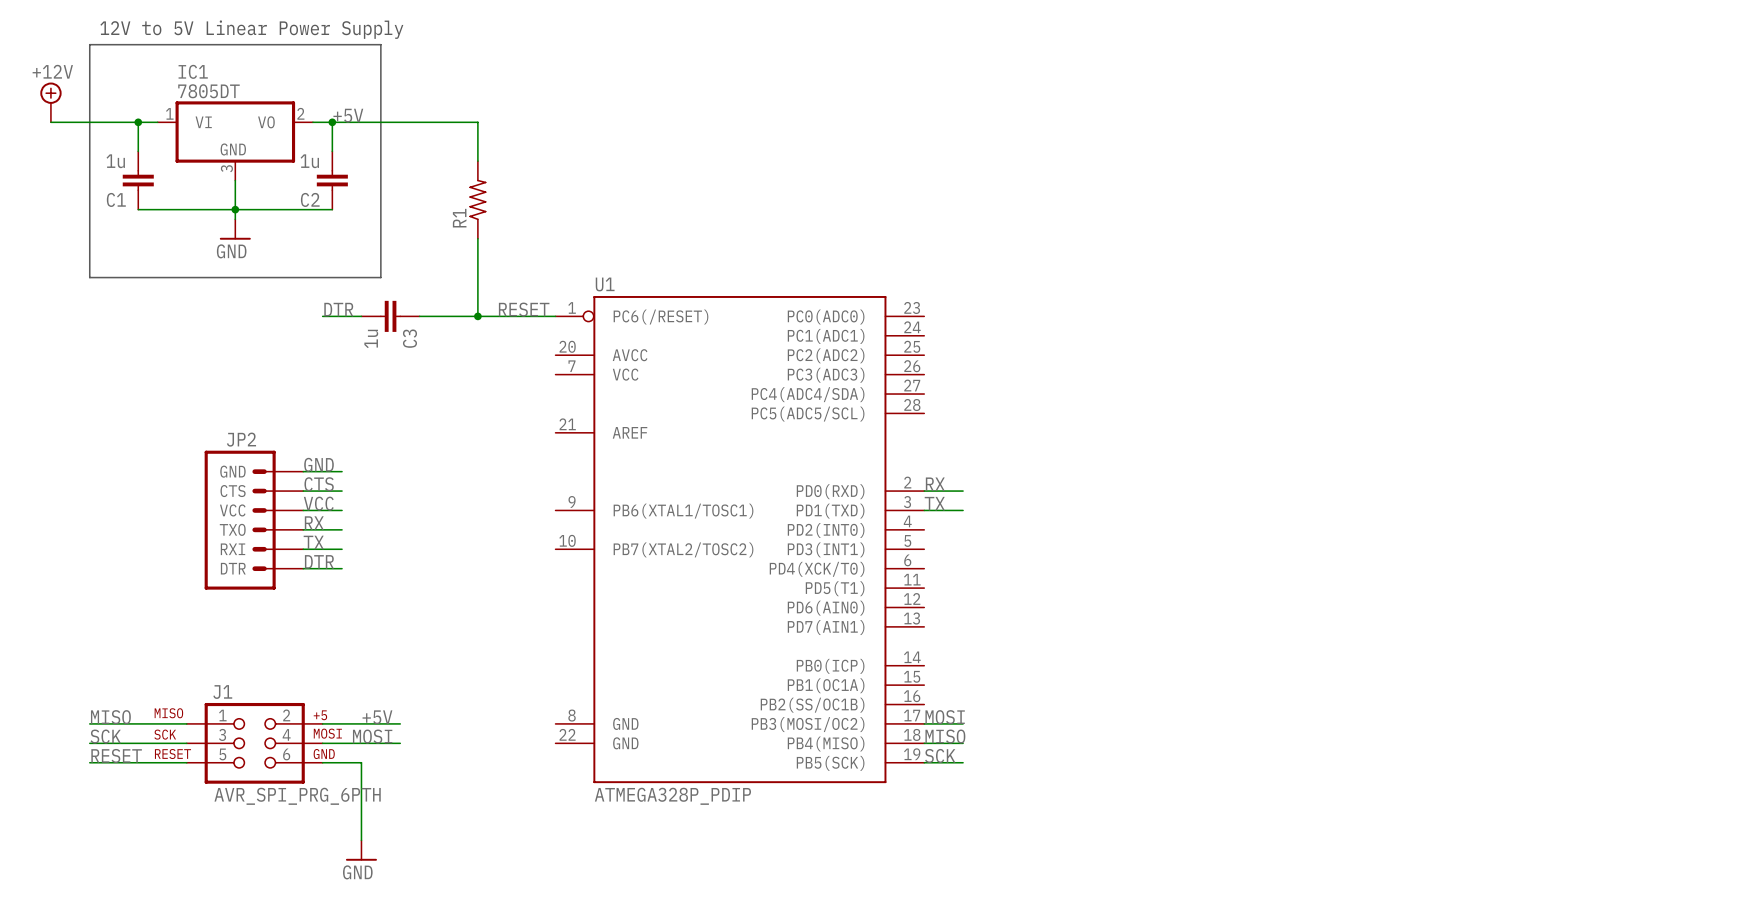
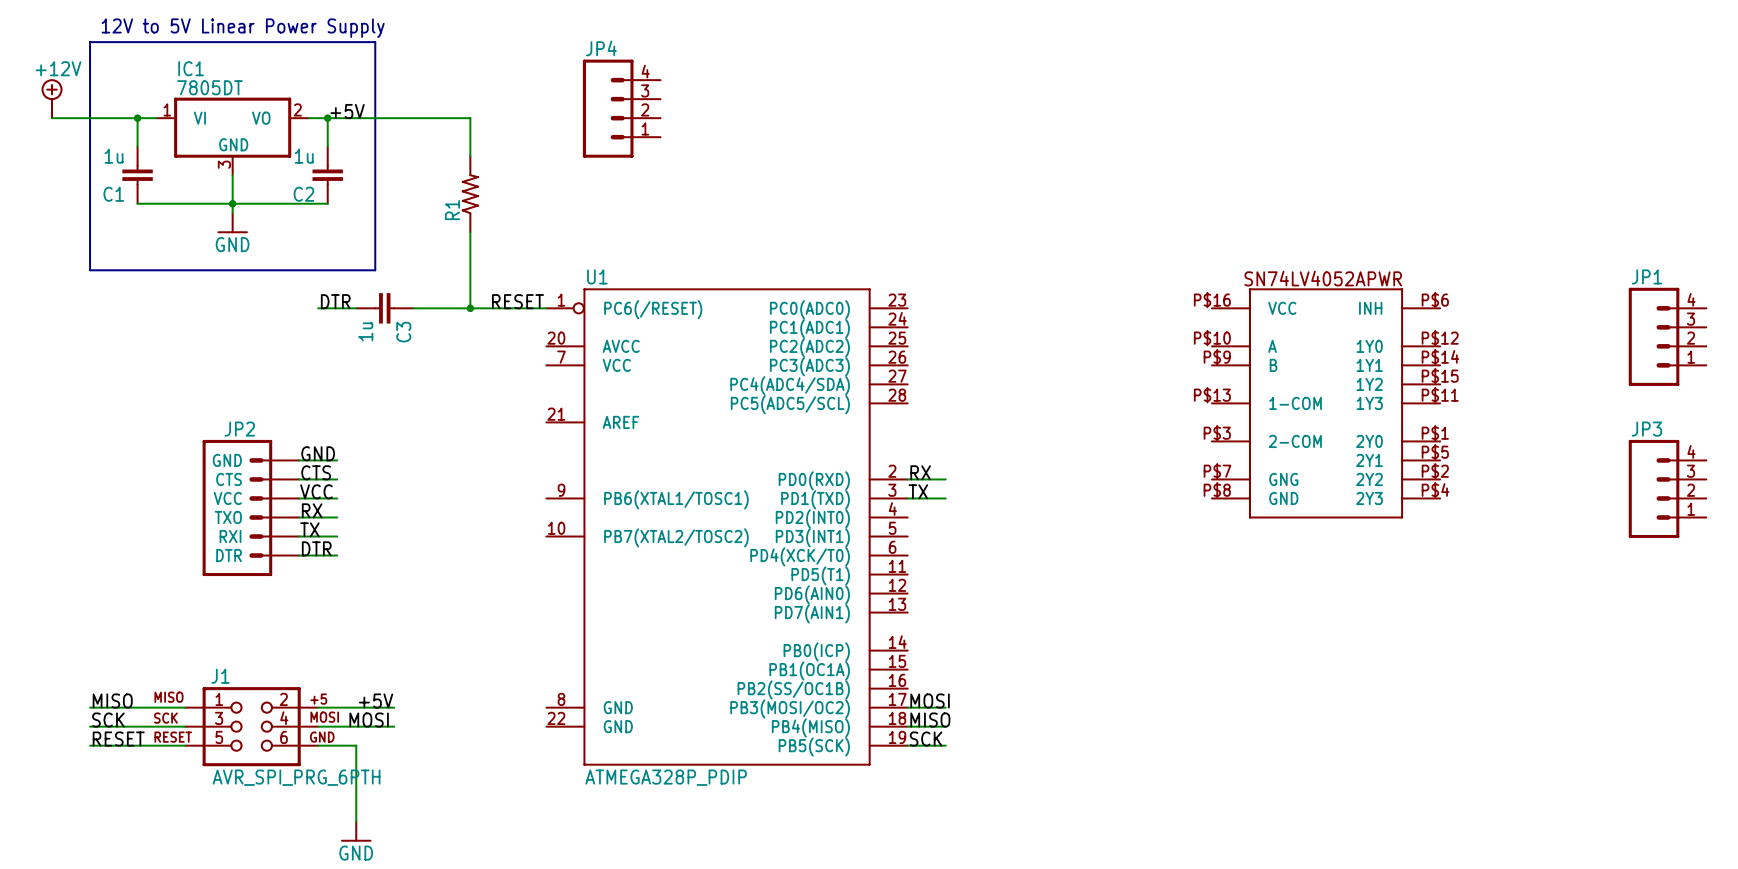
JP4: none -> (621, 108)
JP1: none -> (1667, 336)
part: none -> (1326, 403)
JP3: none -> (1667, 488)

